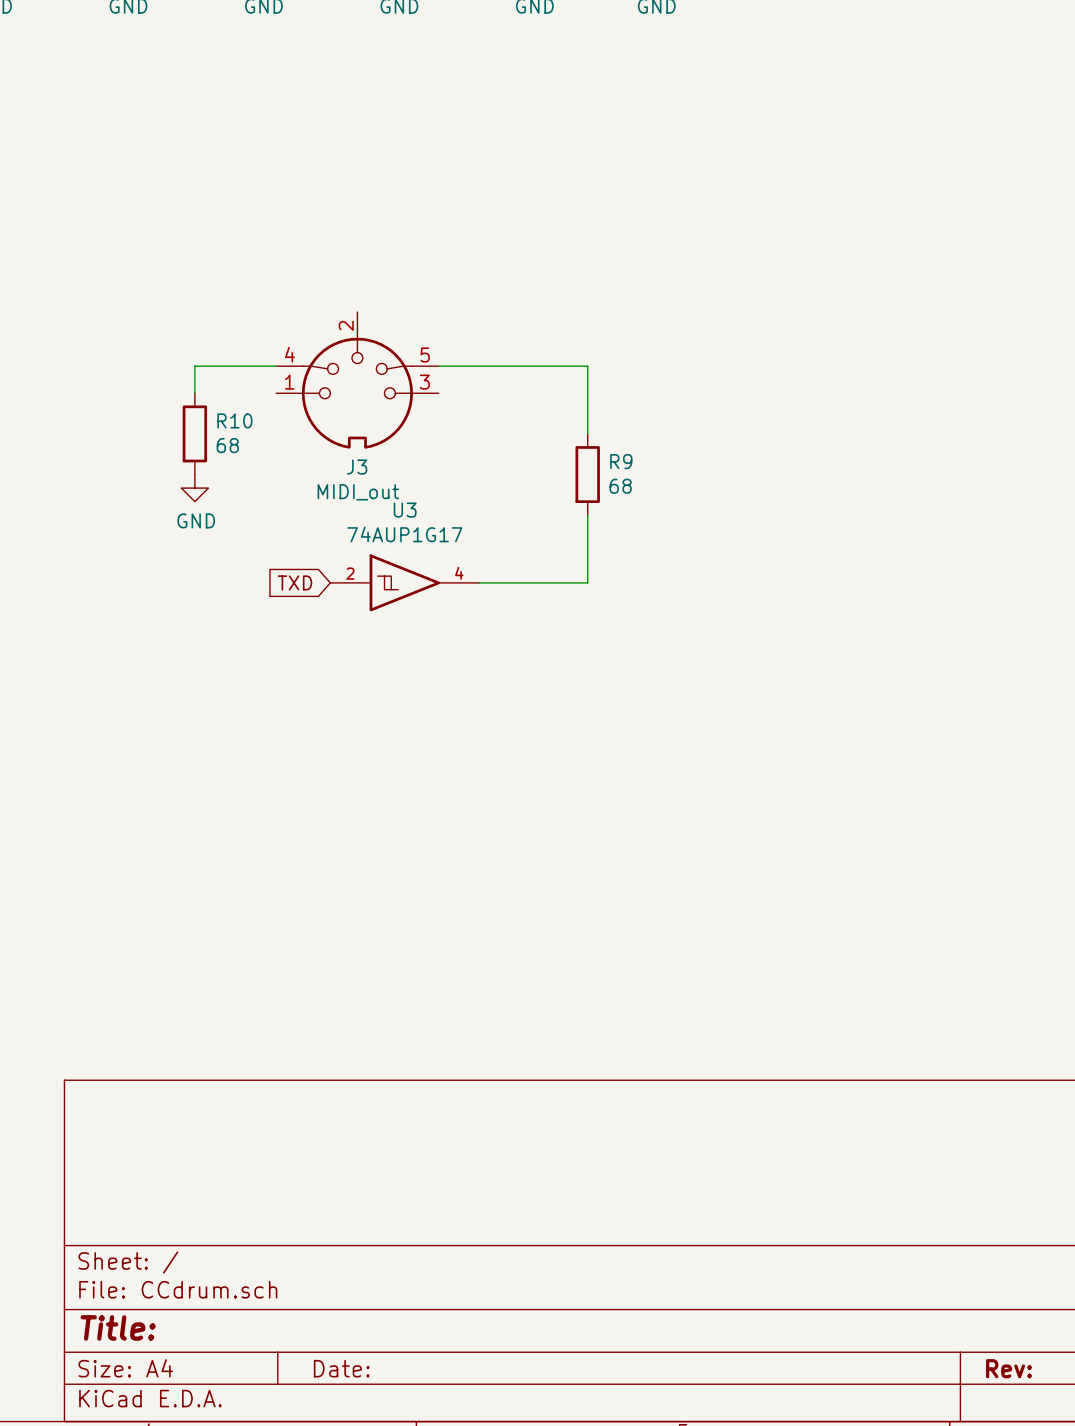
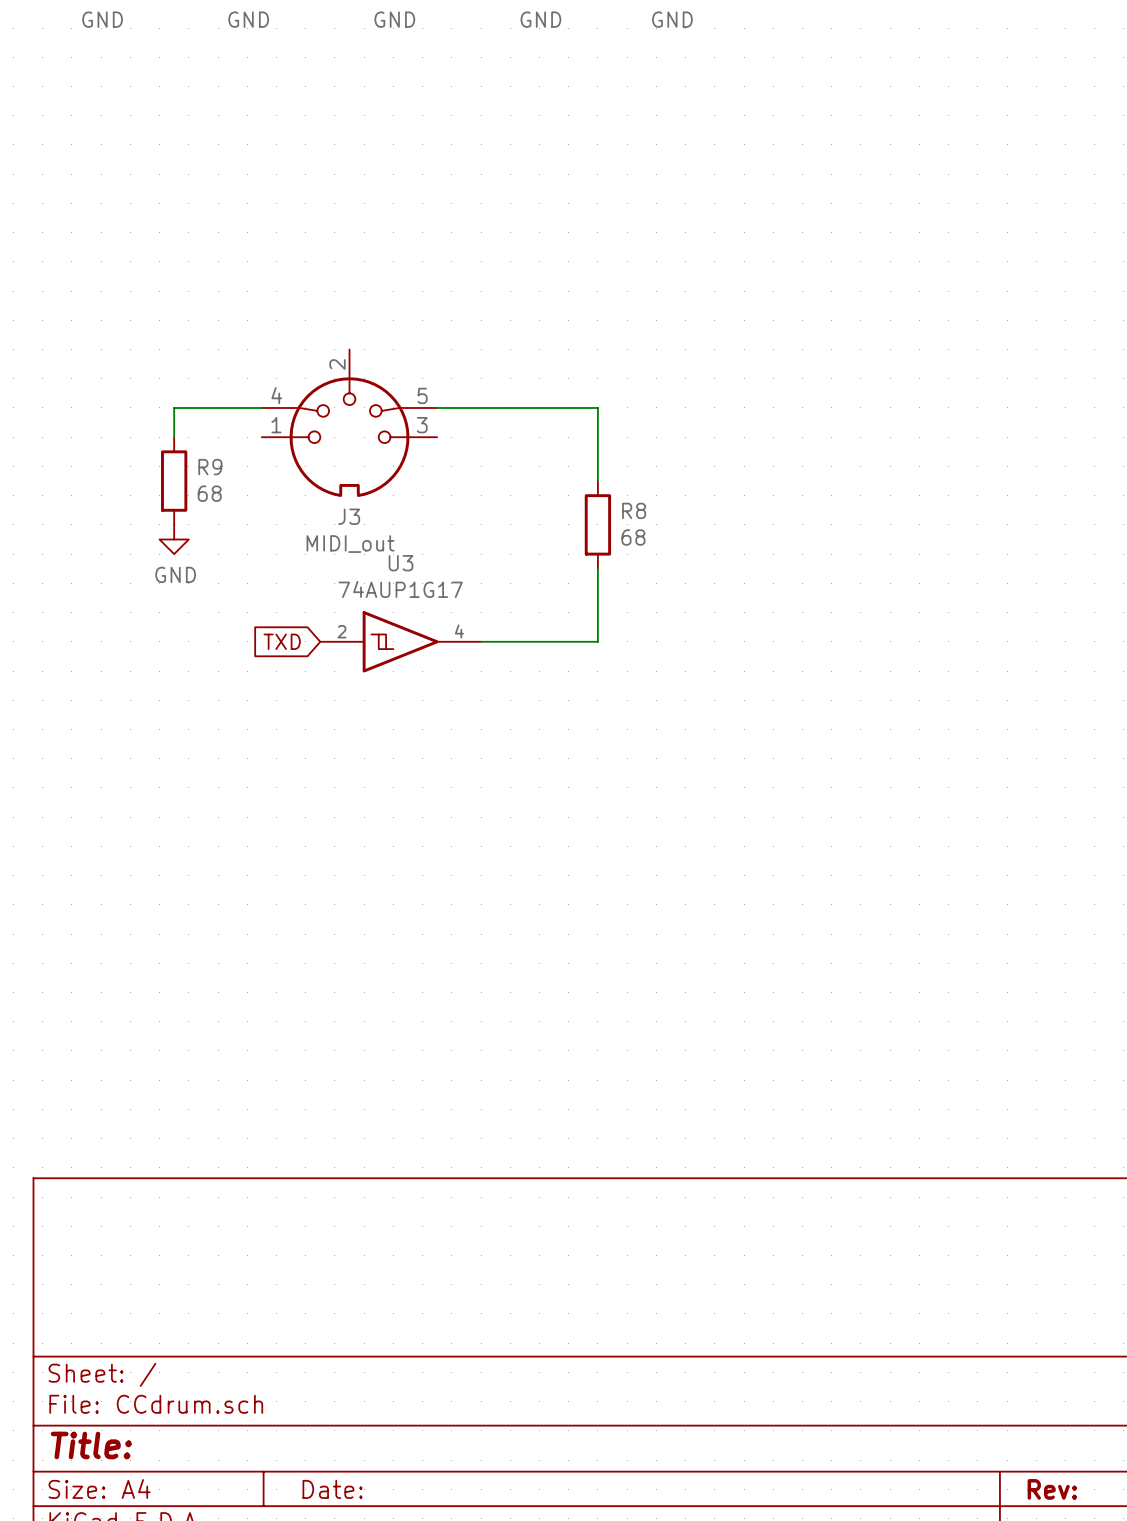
R10 name: R10 (234, 420) -> R9 (210, 467)
R9 name: R9 (621, 461) -> R8 (634, 510)

